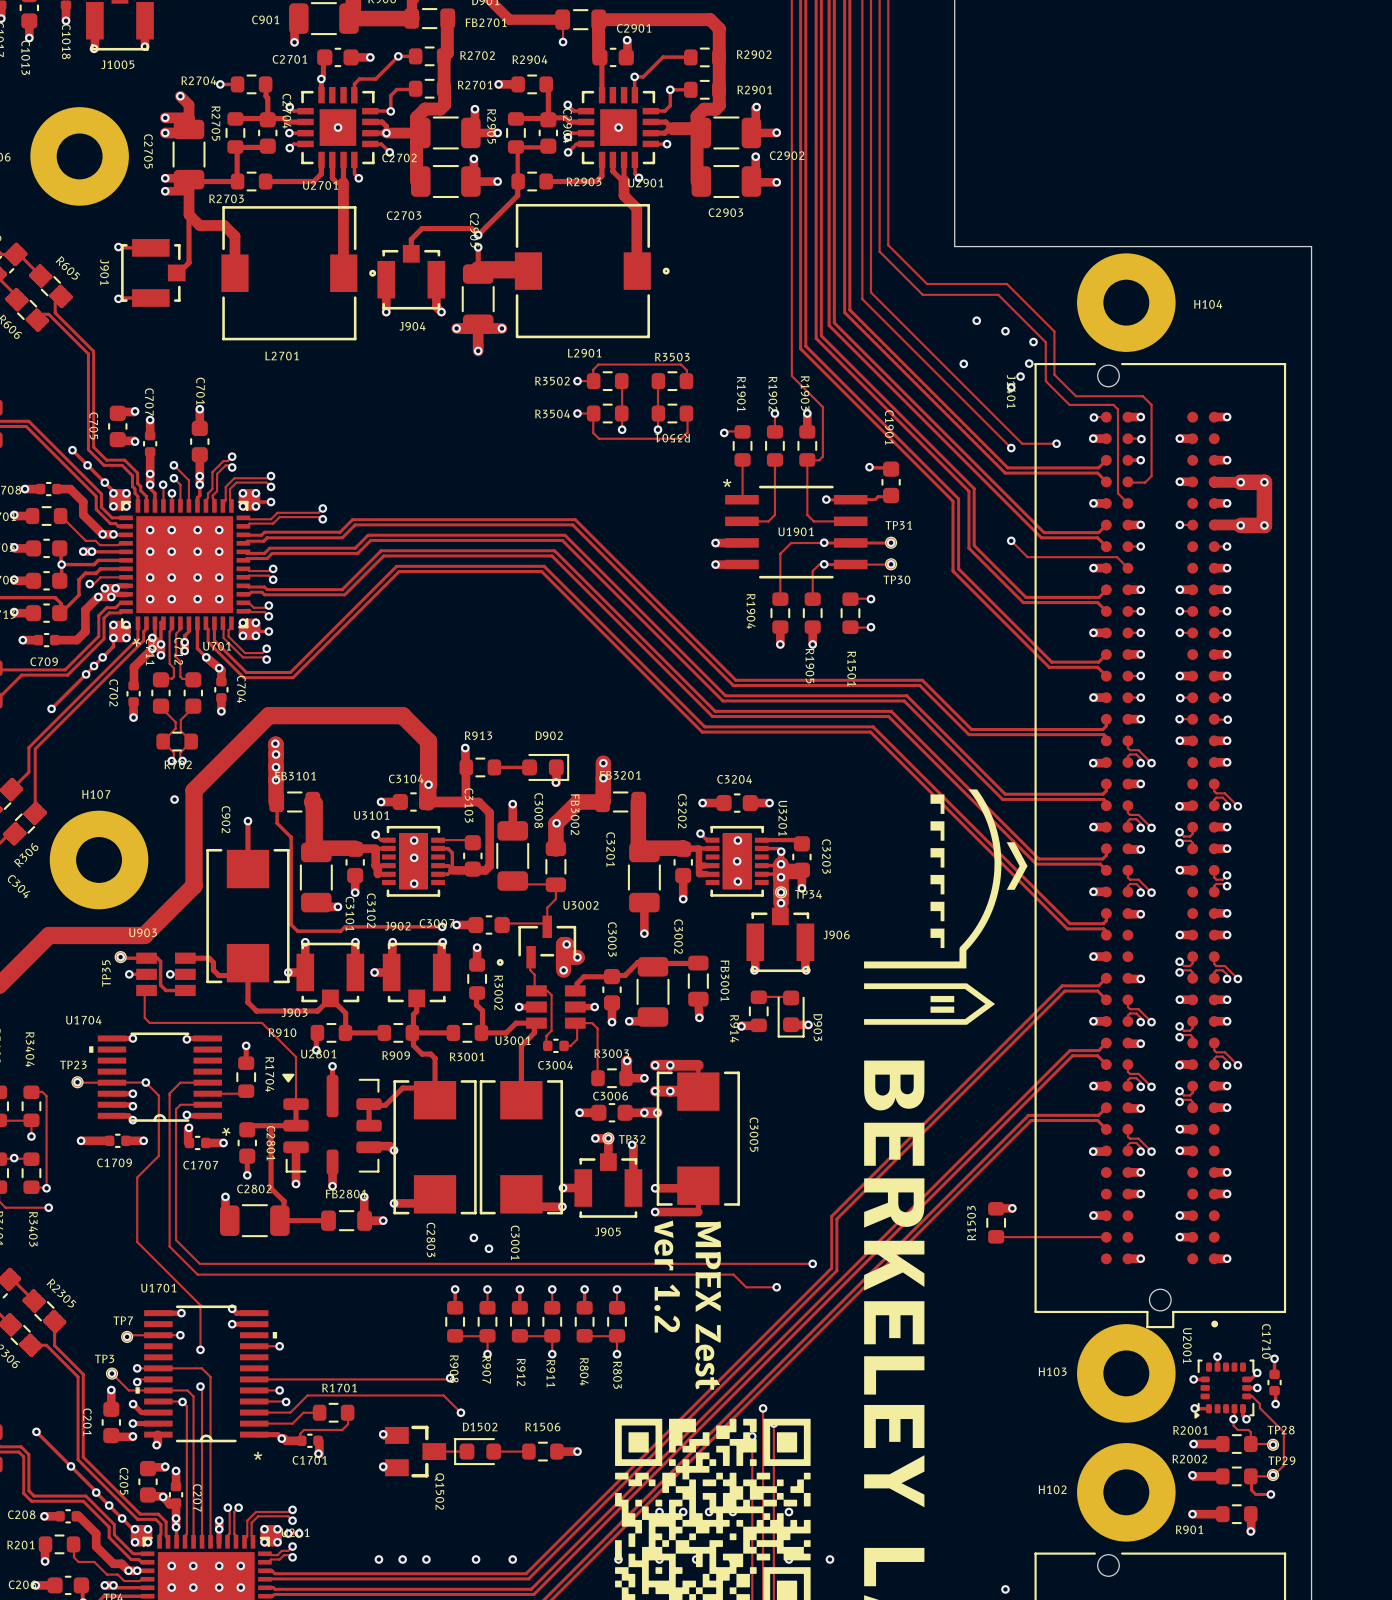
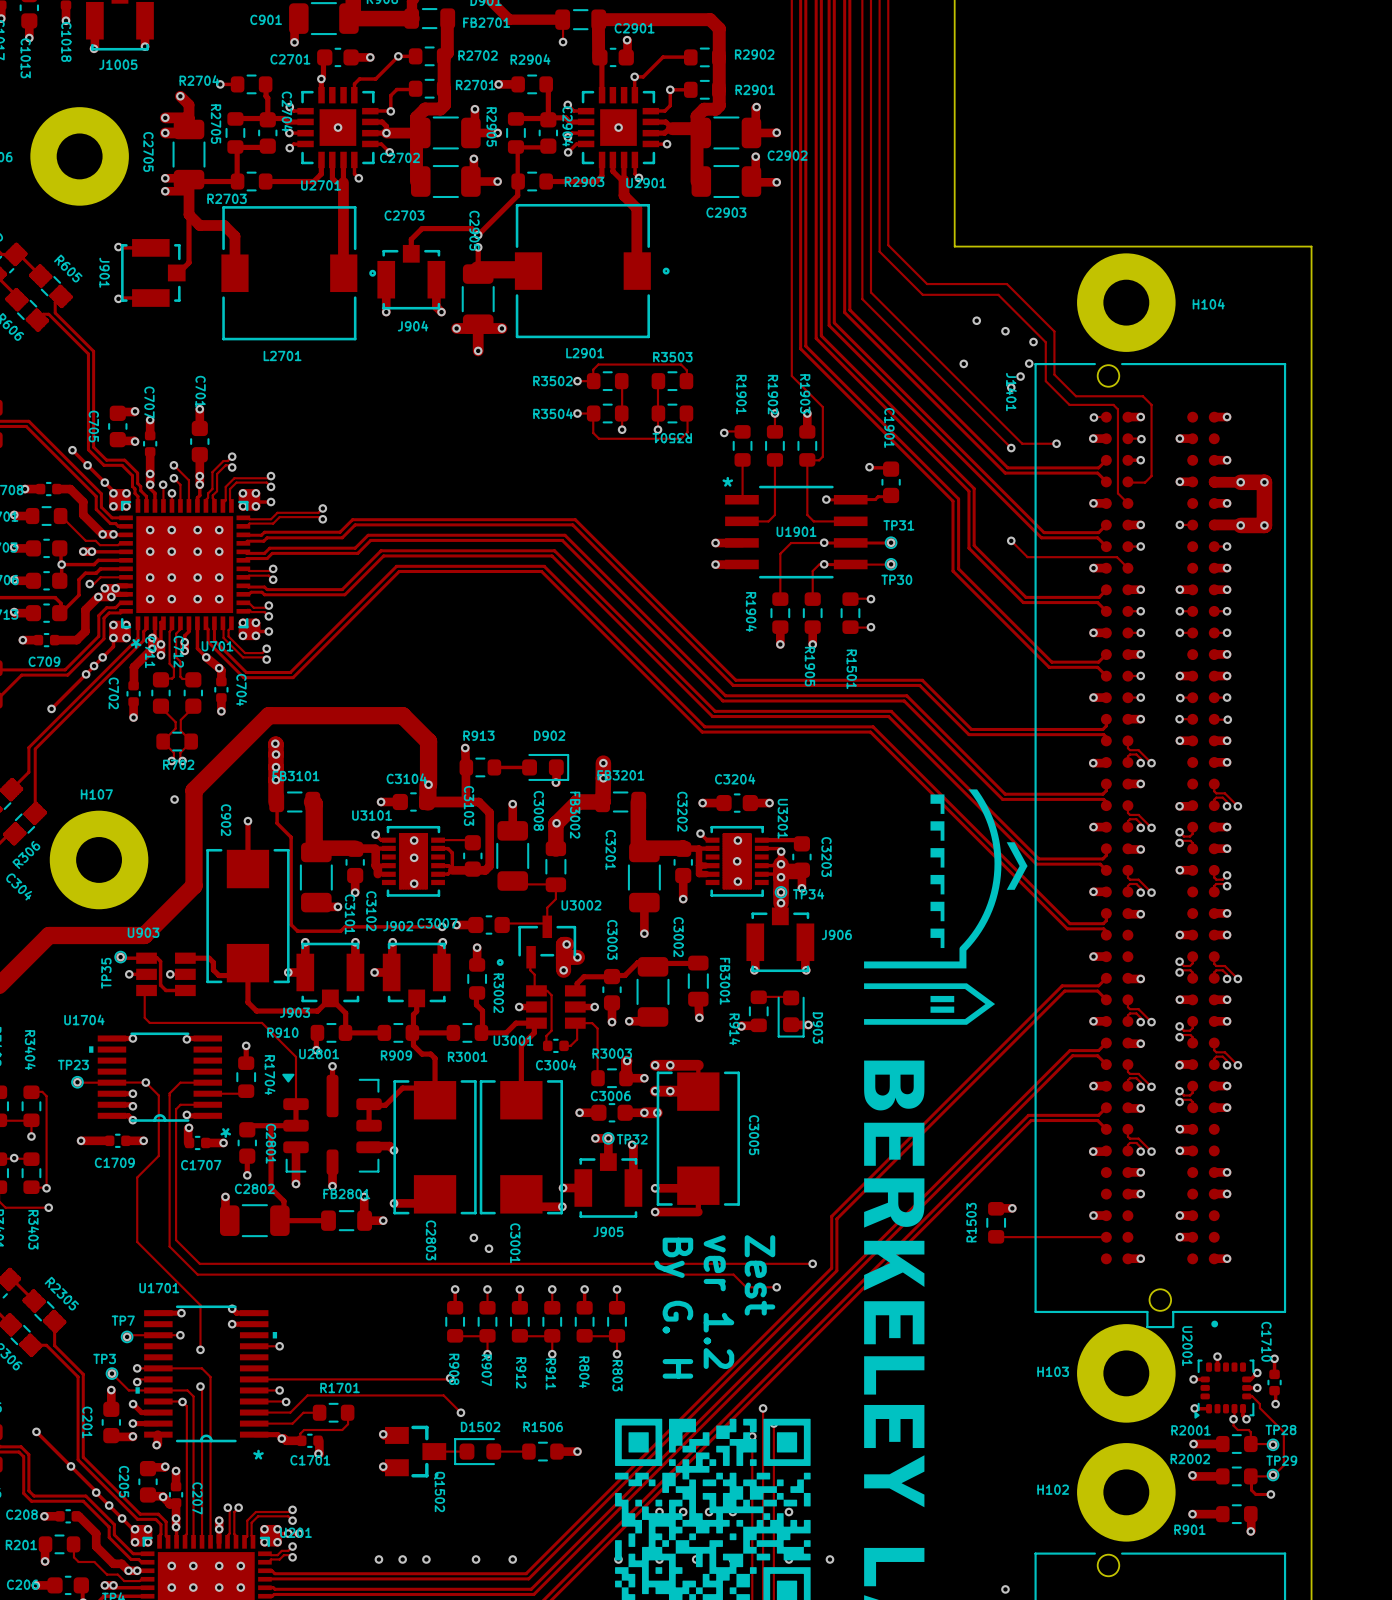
text position: ver 1.2 (667, 1276) -> ver 1.2 (718, 1302)
text: none -> By G. H (673, 1308)
text: MPEX Zest (708, 1305) -> Zest (759, 1275)

